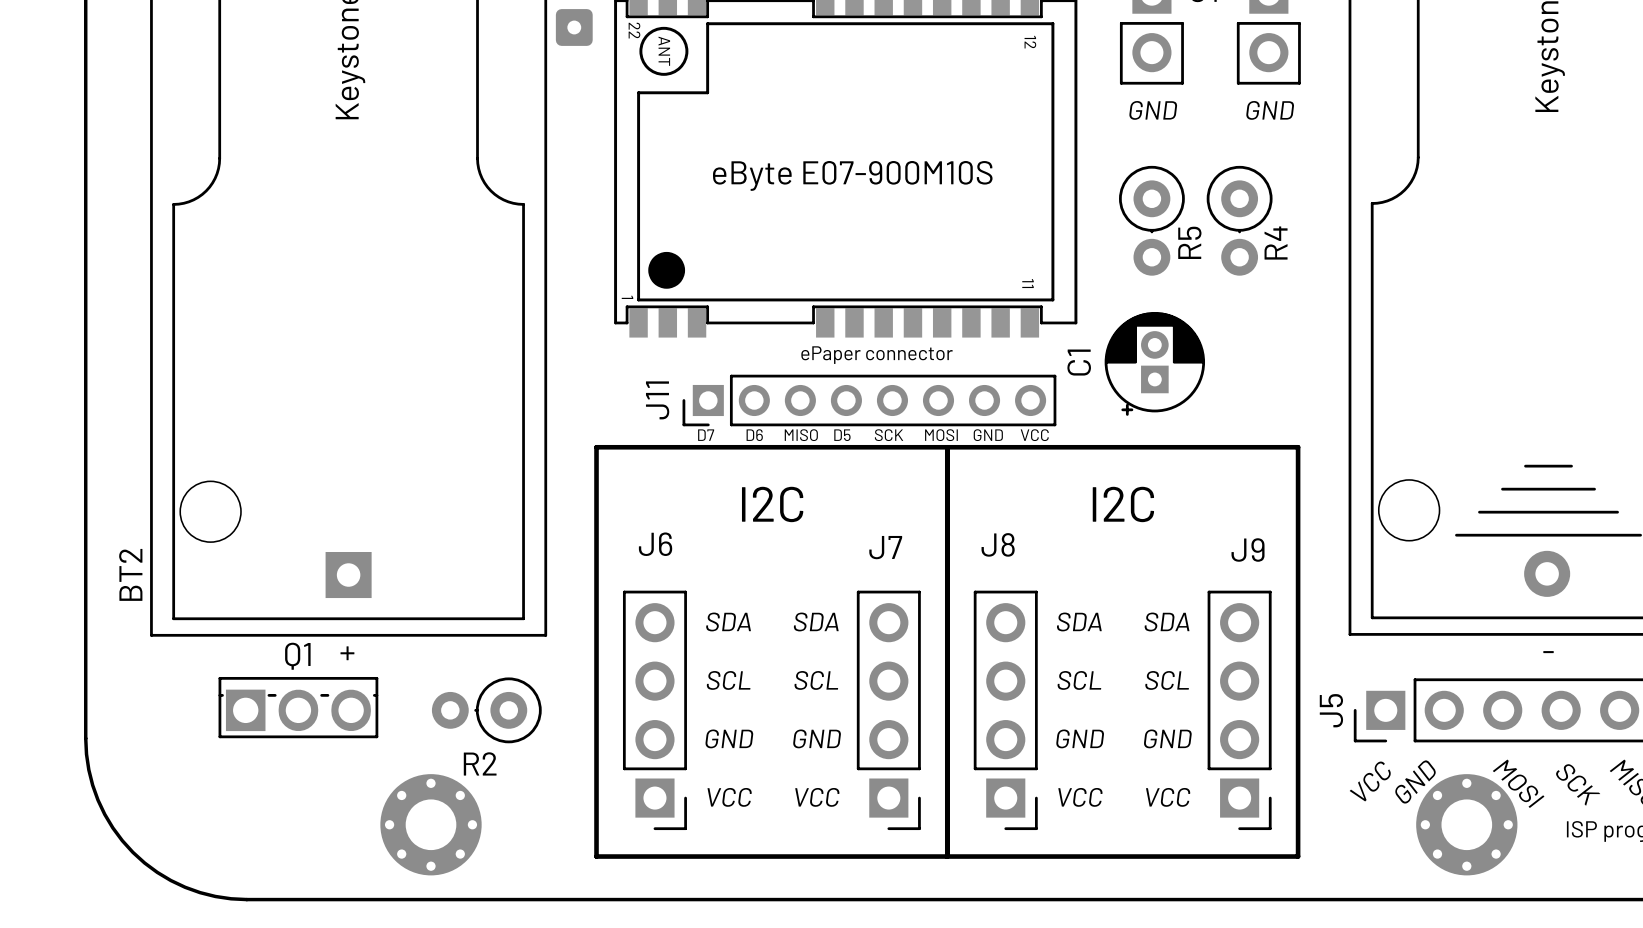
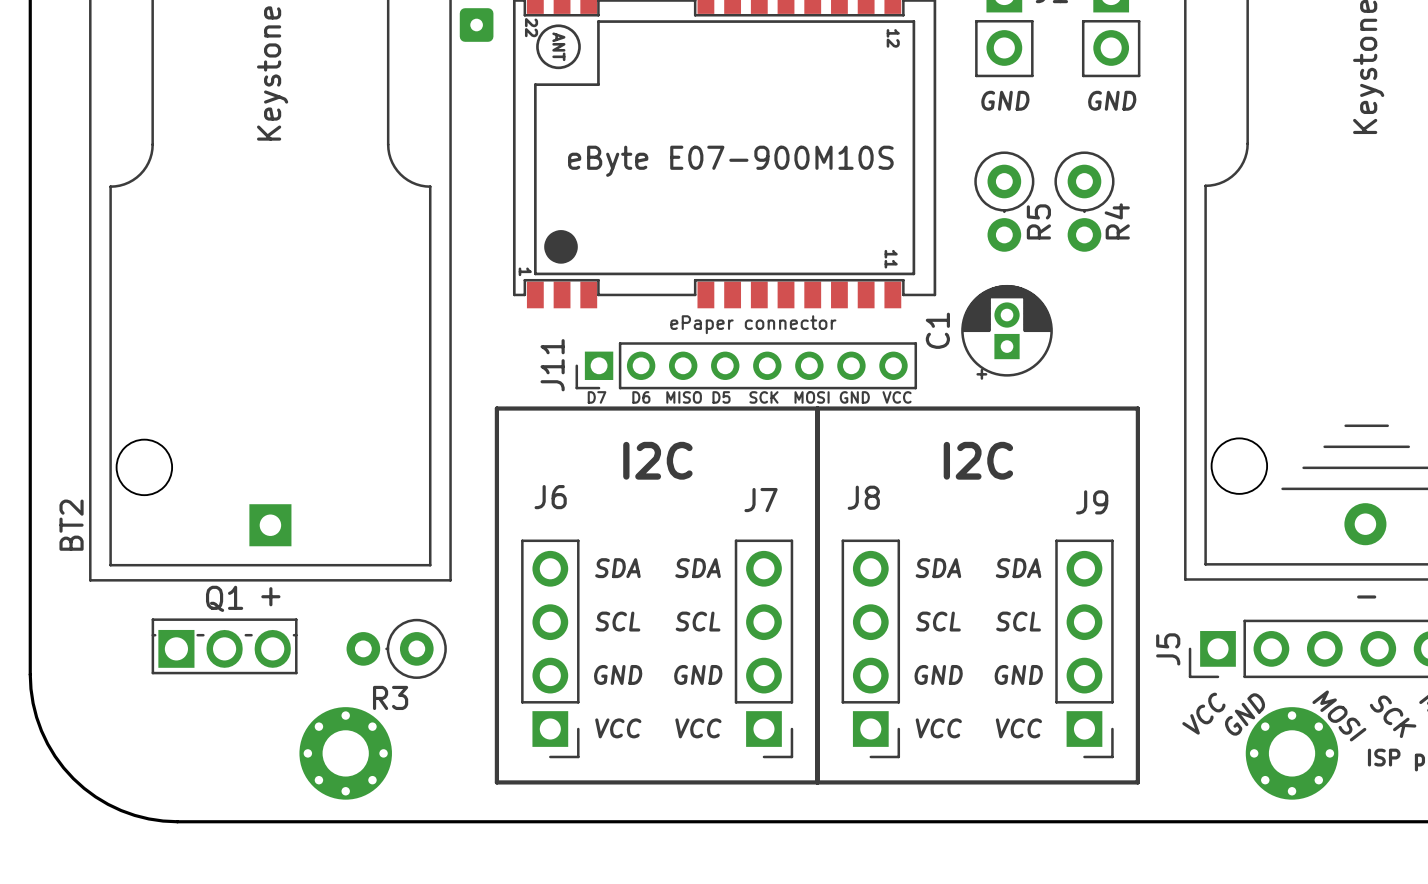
R2 name: R2 (480, 763) -> R3 (390, 697)

